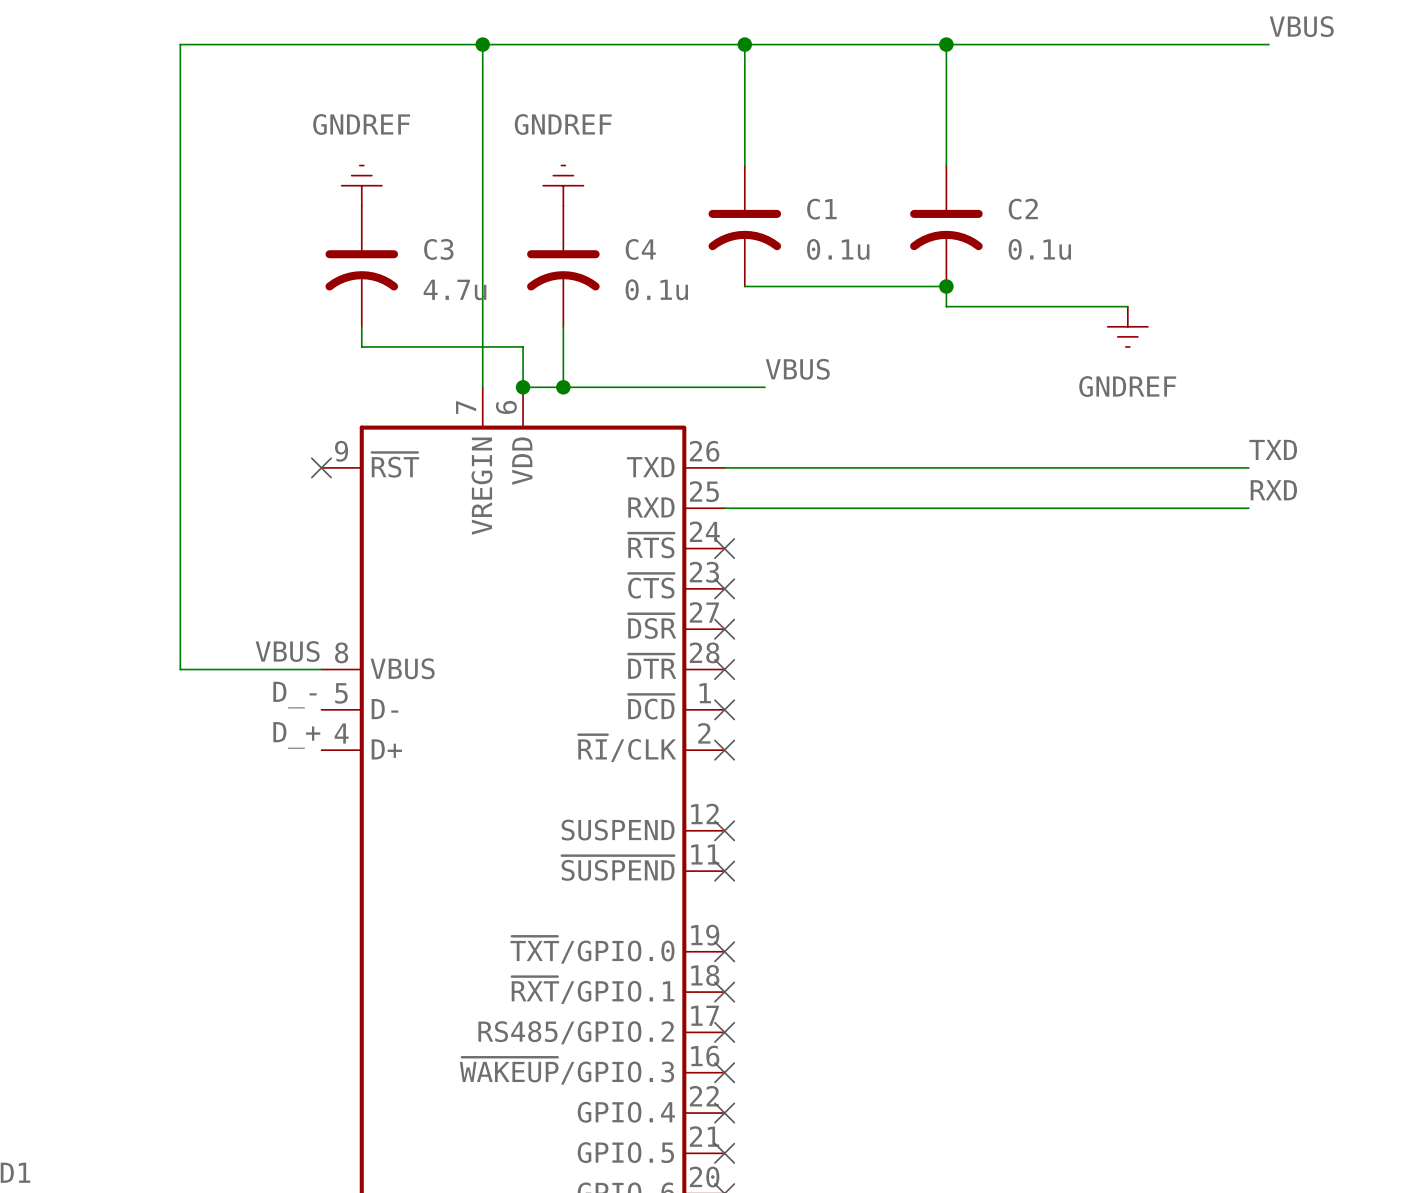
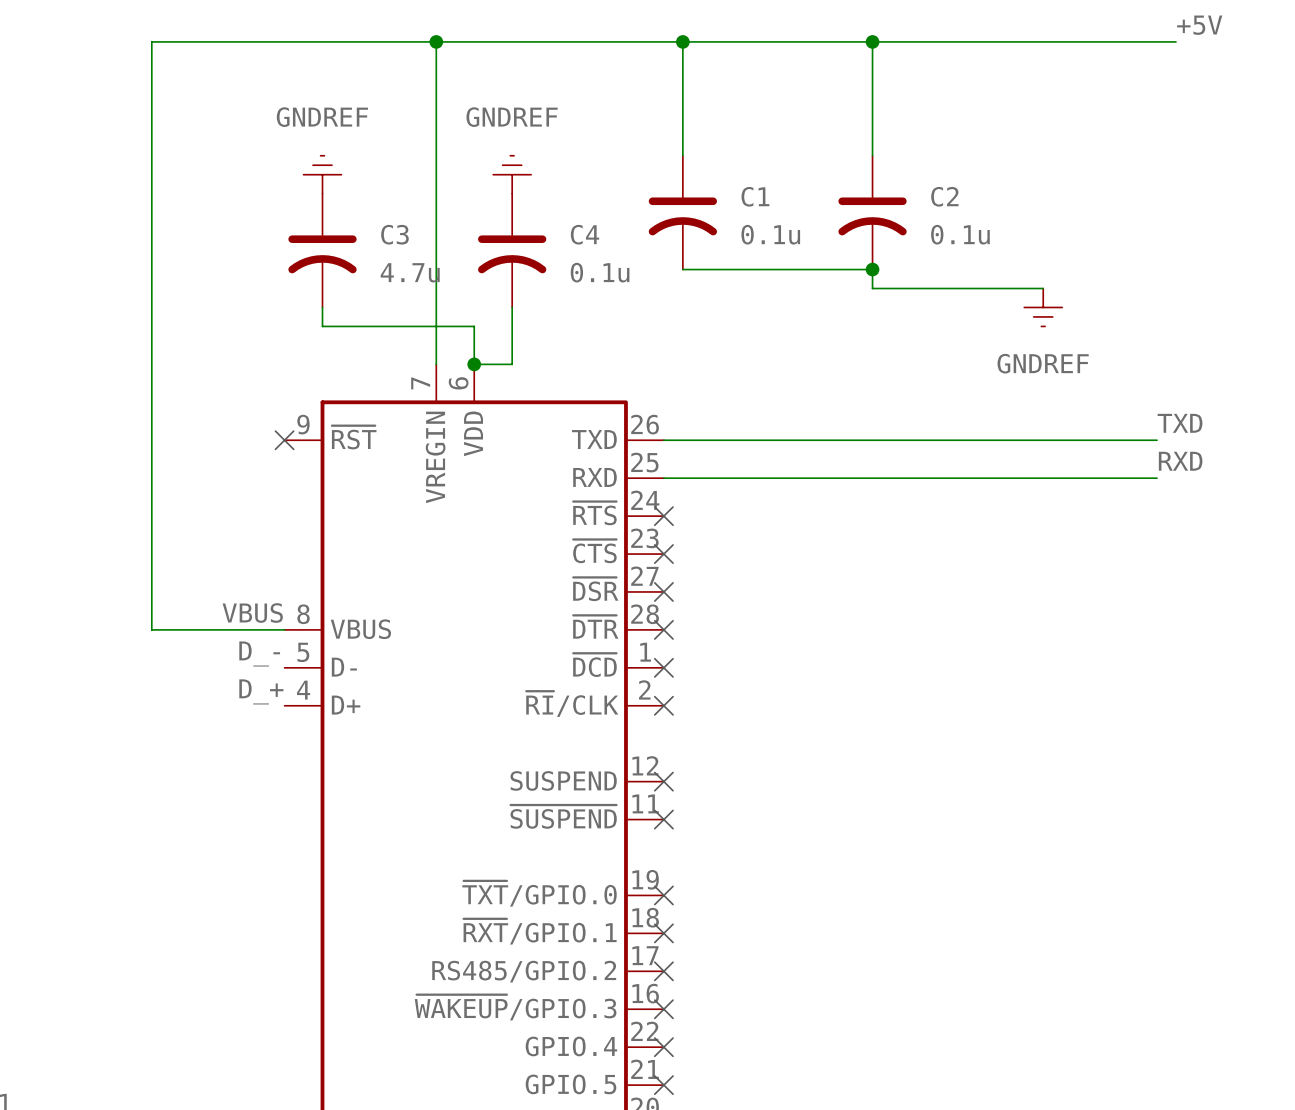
label: VBUS (1301, 26) -> +5V (1199, 25)
label: VBUS (797, 369) -> none
wire: (563, 387) (764, 387) -> none
junction: (563, 387) -> none

